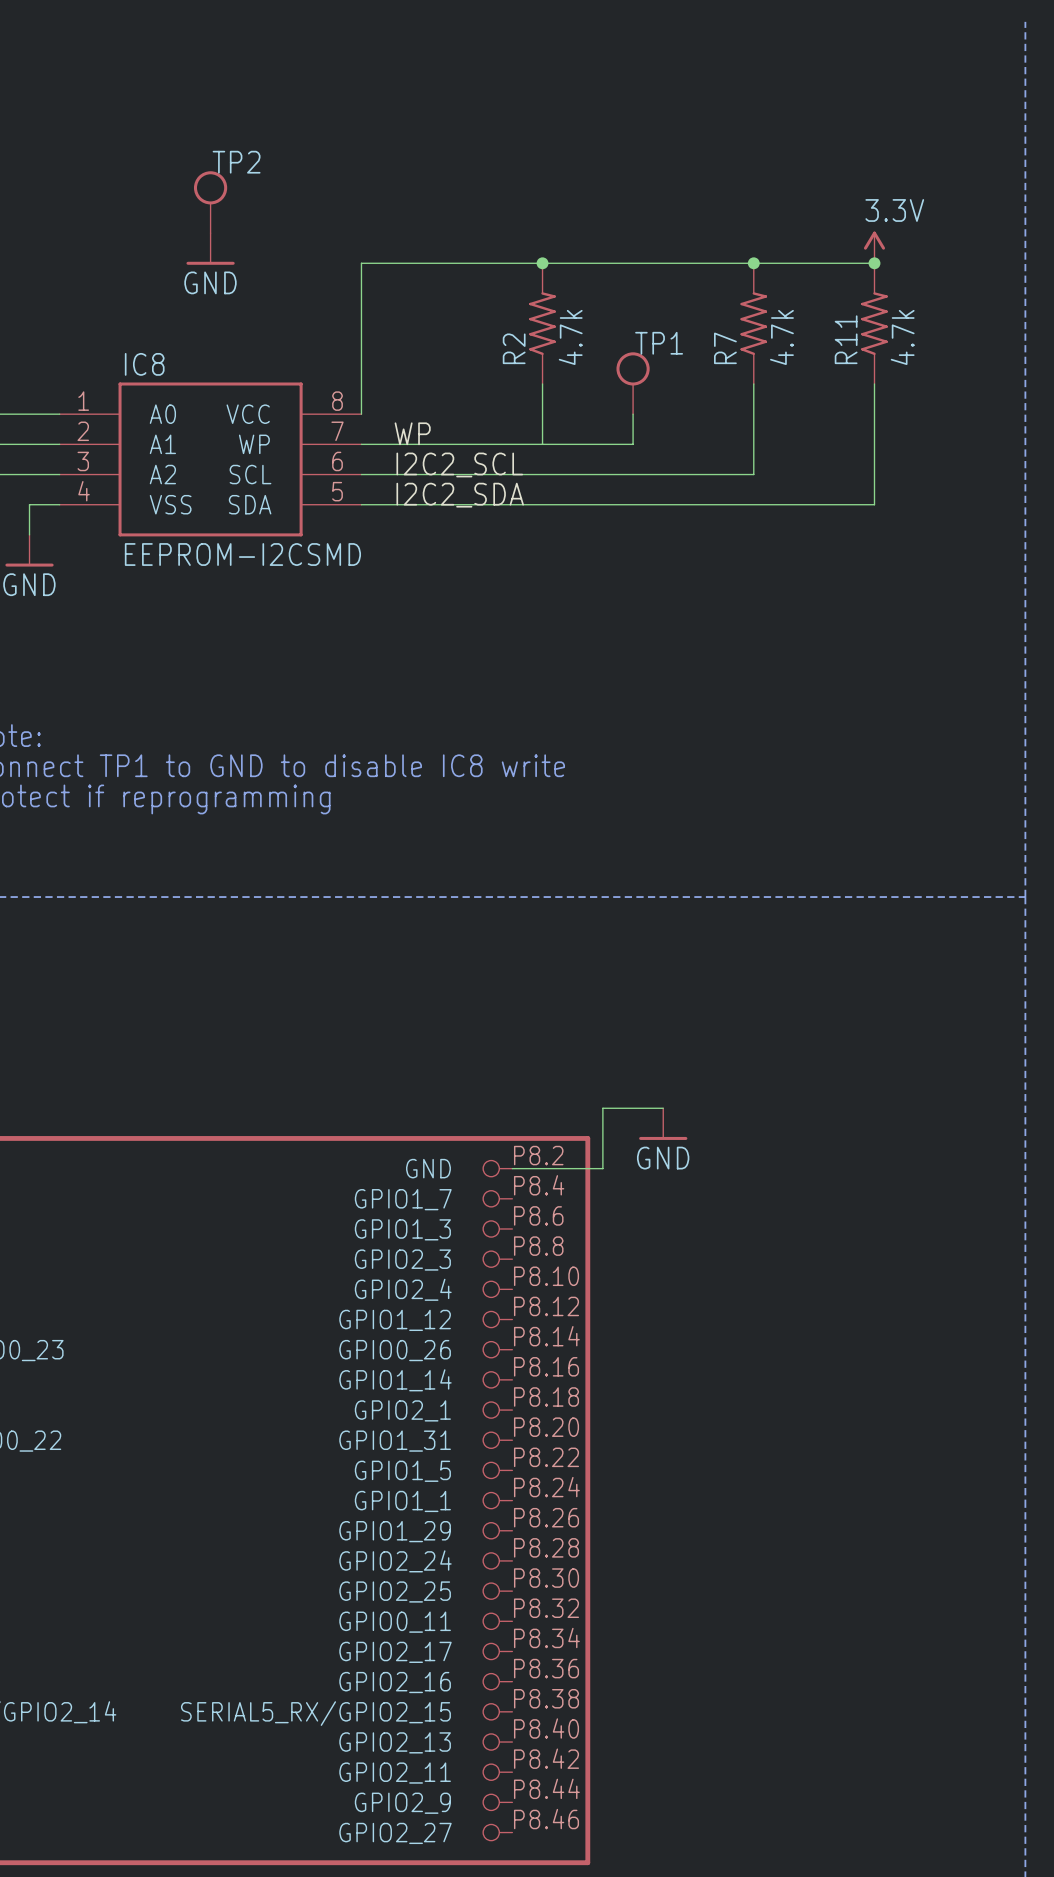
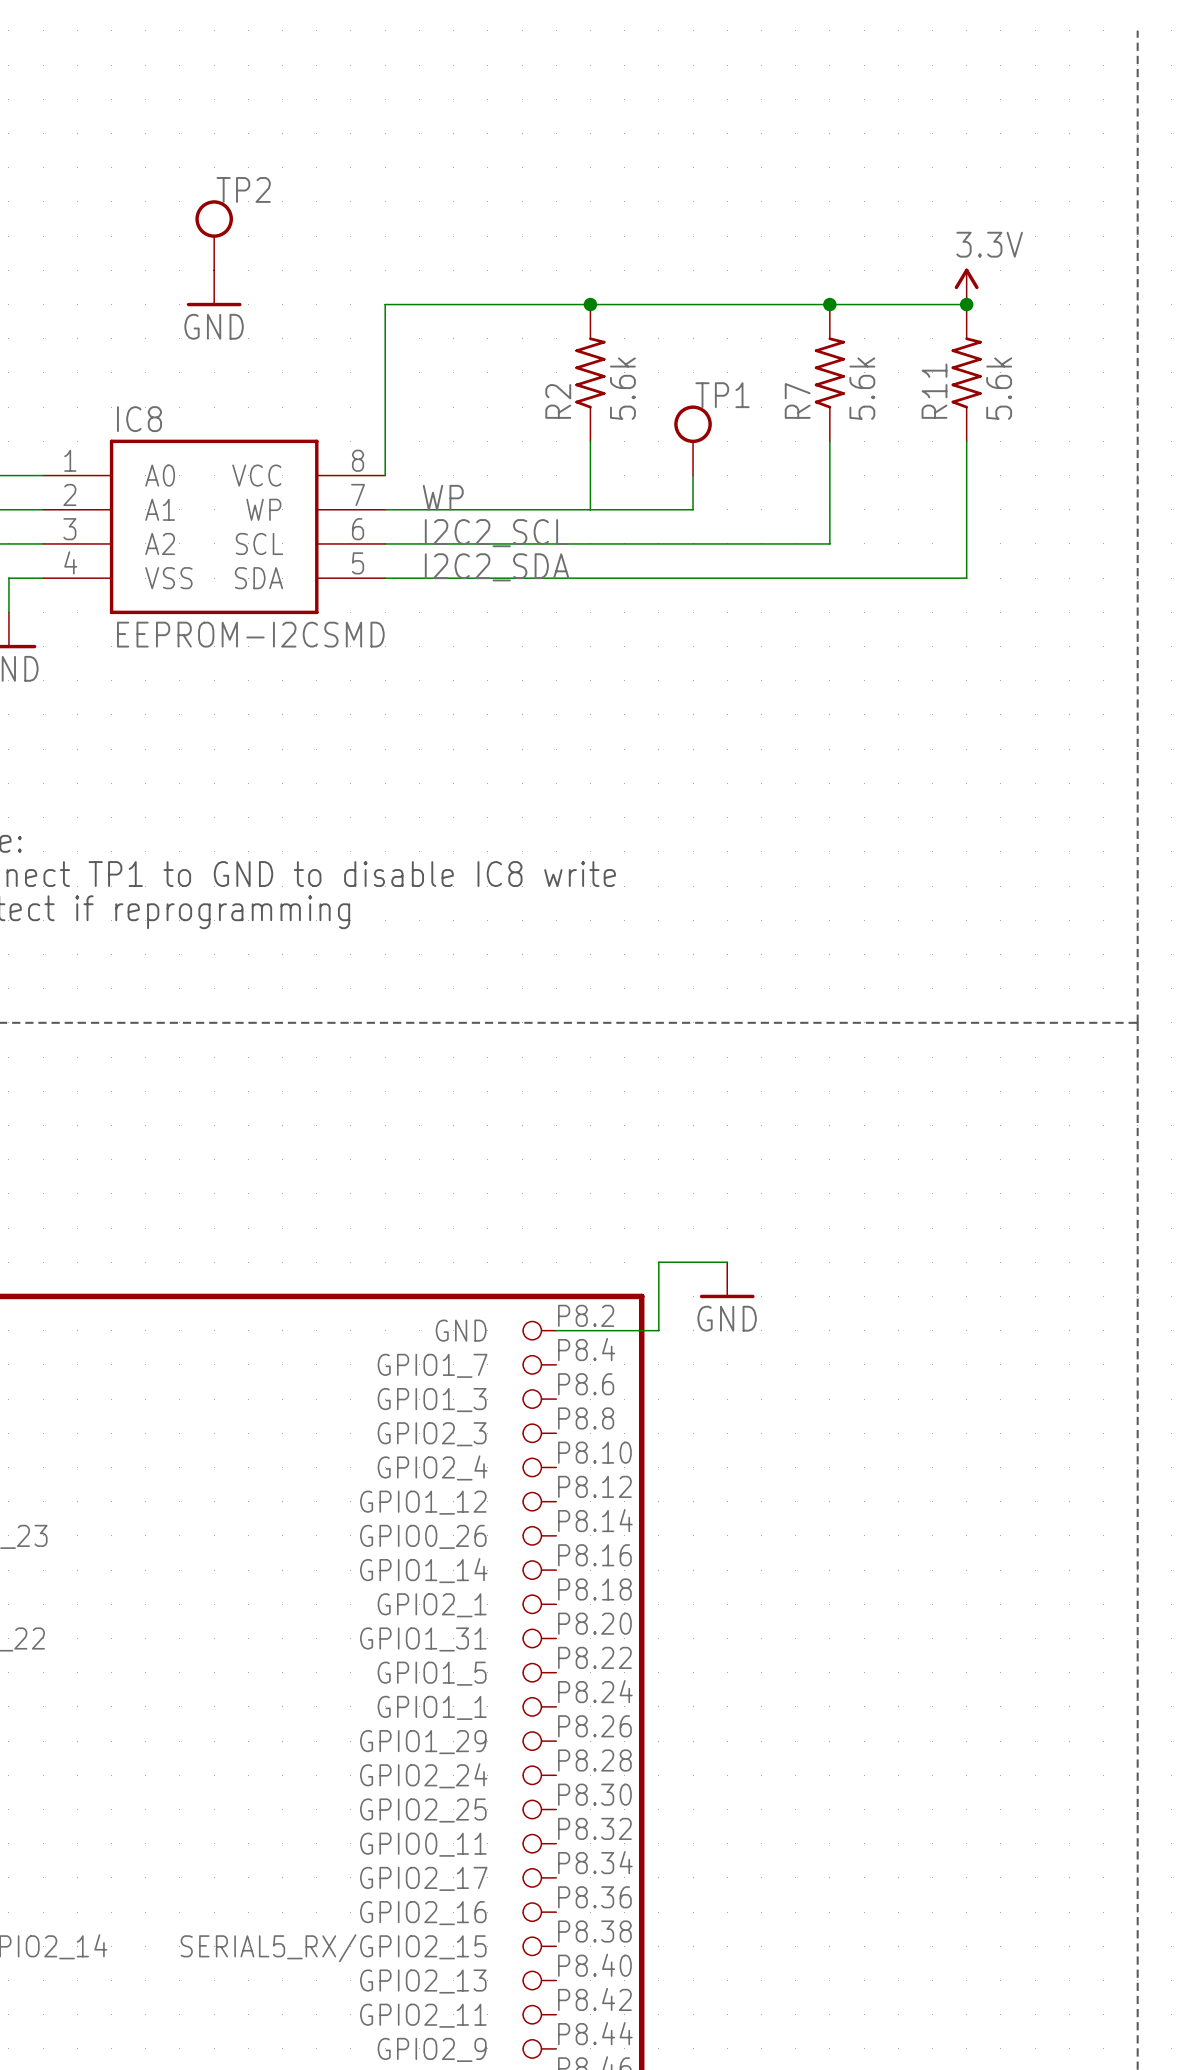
R2 value: 4.7k (570, 337) -> 5.6k (622, 388)
R7 value: 4.7k (781, 337) -> 5.6k (862, 388)
R11 value: 4.7k (902, 337) -> 5.6k (999, 388)

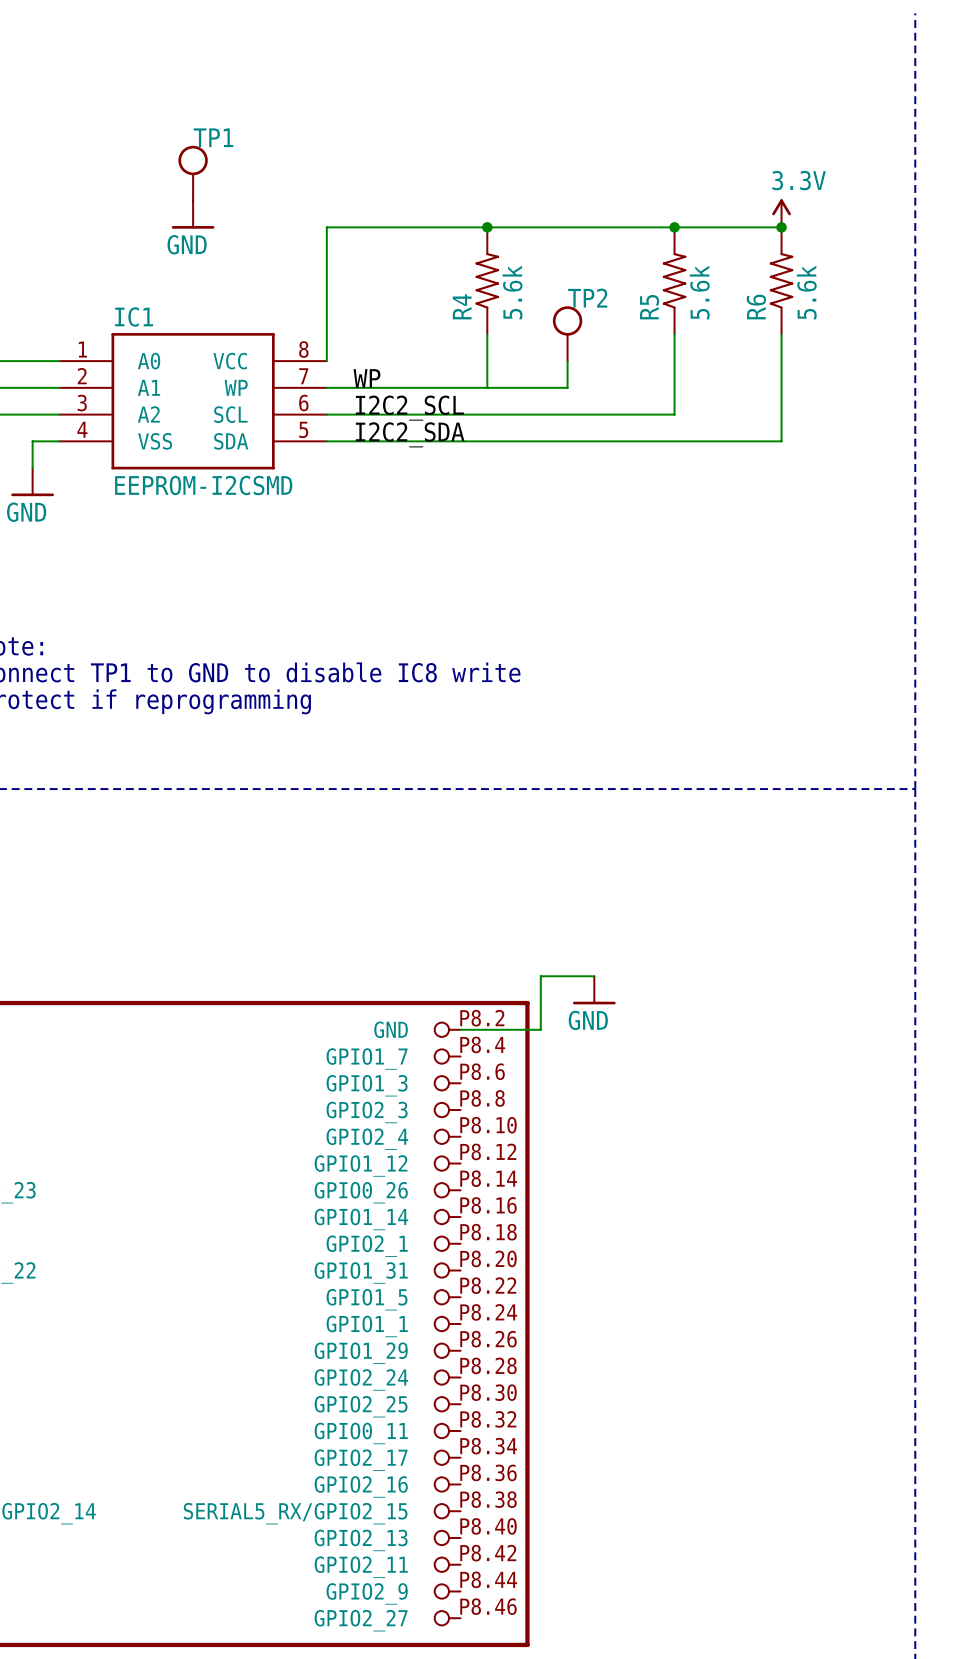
TP2 name: TP2 (243, 189) -> TP1 (213, 137)
R11 name: R11 (934, 391) -> R6 (756, 307)
TP1 name: TP1 (722, 395) -> TP2 (587, 298)
R7 name: R7 (797, 400) -> R5 (649, 307)
R2 name: R2 (558, 401) -> R4 (462, 306)
IC8 name: IC8 (139, 419) -> IC1 (134, 316)

